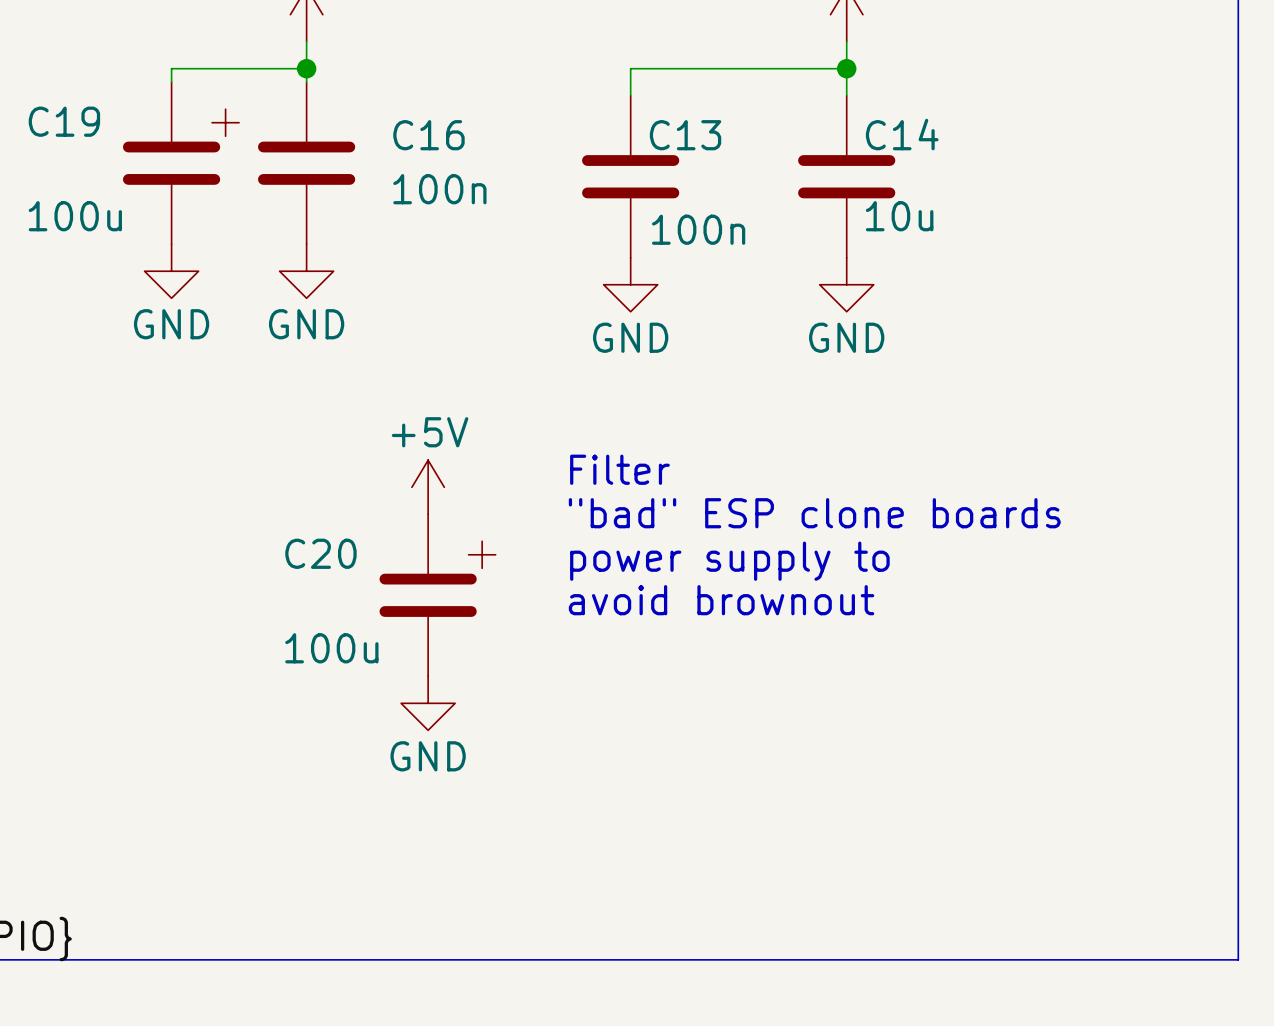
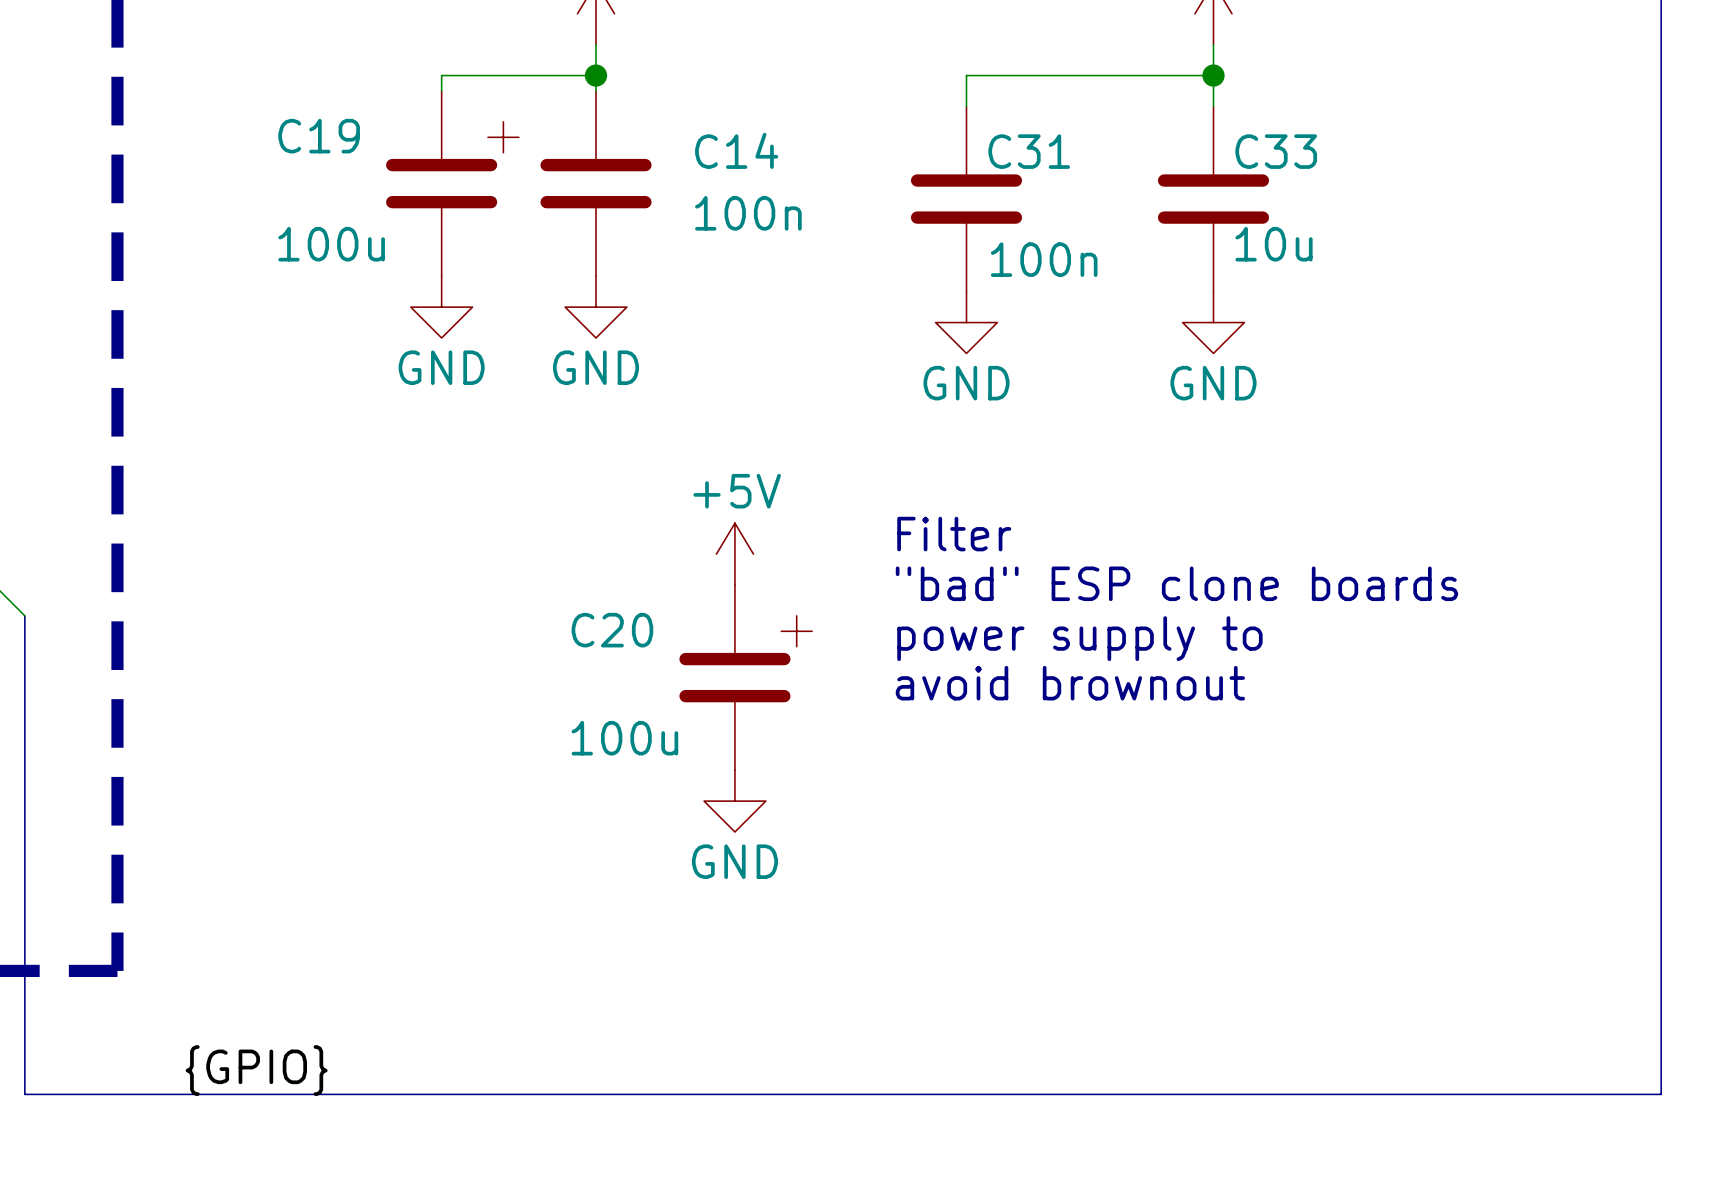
C14 name: C14 (902, 134) -> C33 (1276, 151)
C16 name: C16 (428, 135) -> C14 (736, 150)
C13 name: C13 (685, 135) -> C31 (1029, 151)

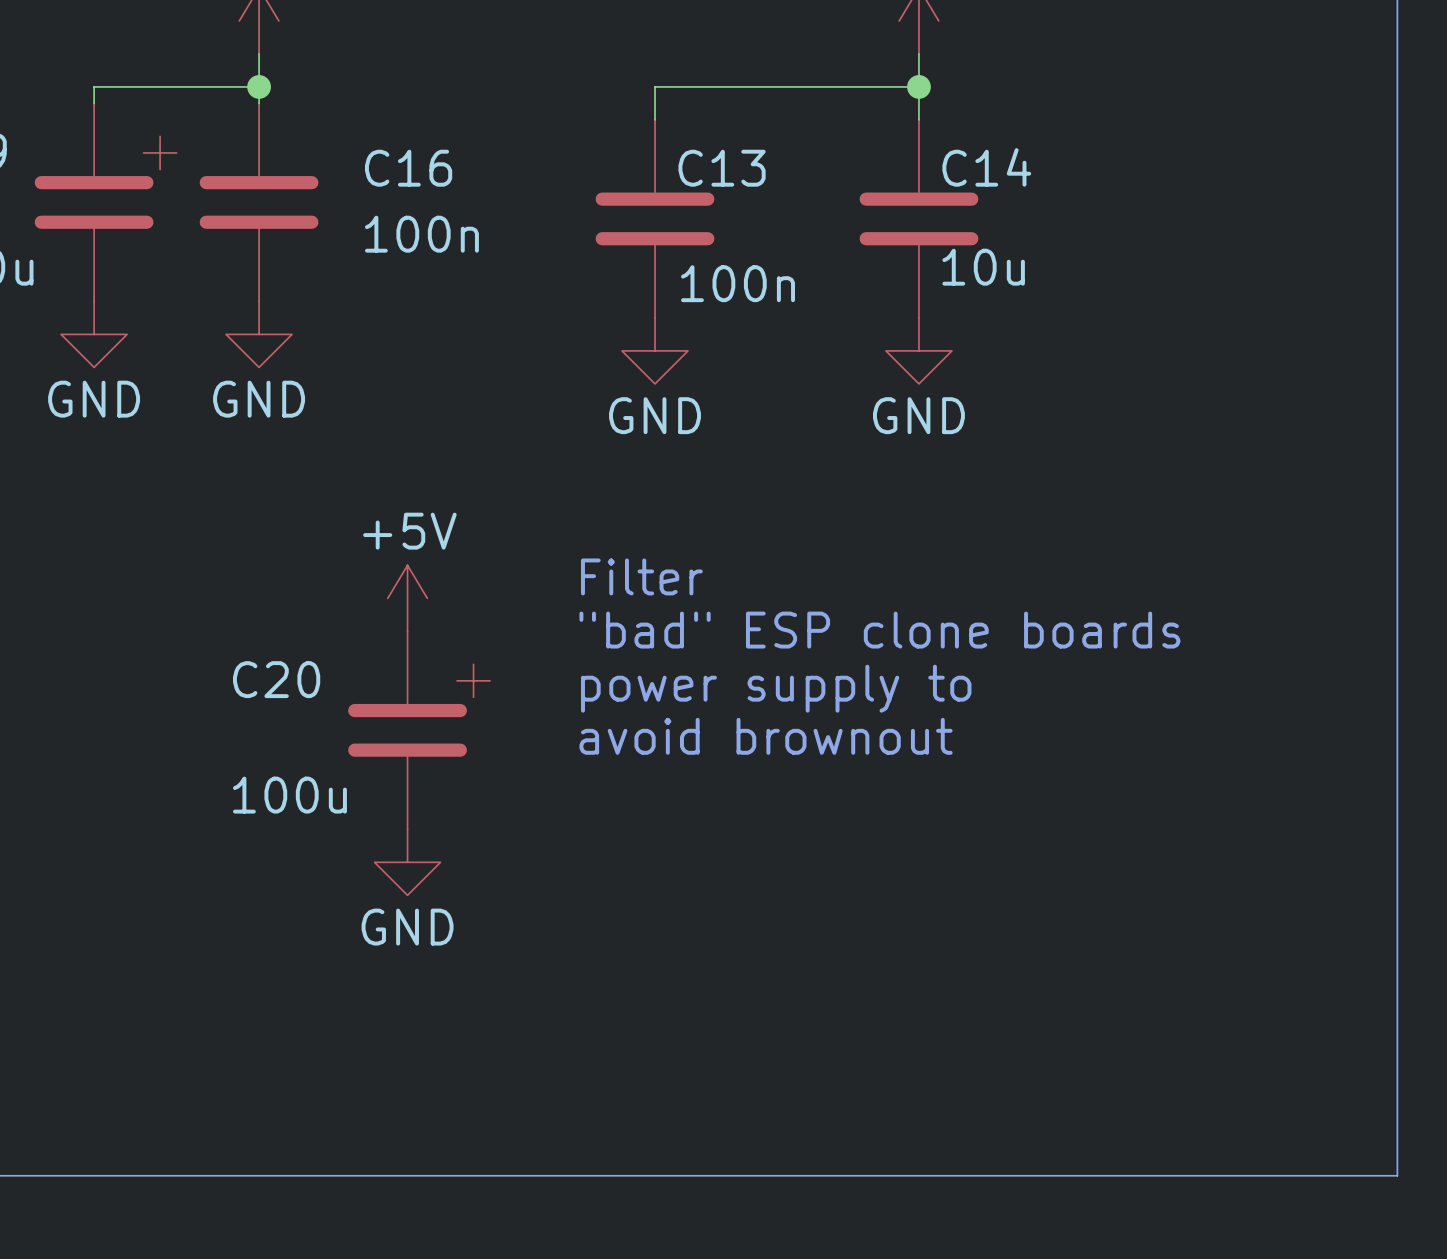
C14 name: C14 (736, 150) -> C16 (408, 168)
C31 name: C31 (1029, 151) -> C13 (722, 168)
C33 name: C33 (1276, 151) -> C14 (986, 167)

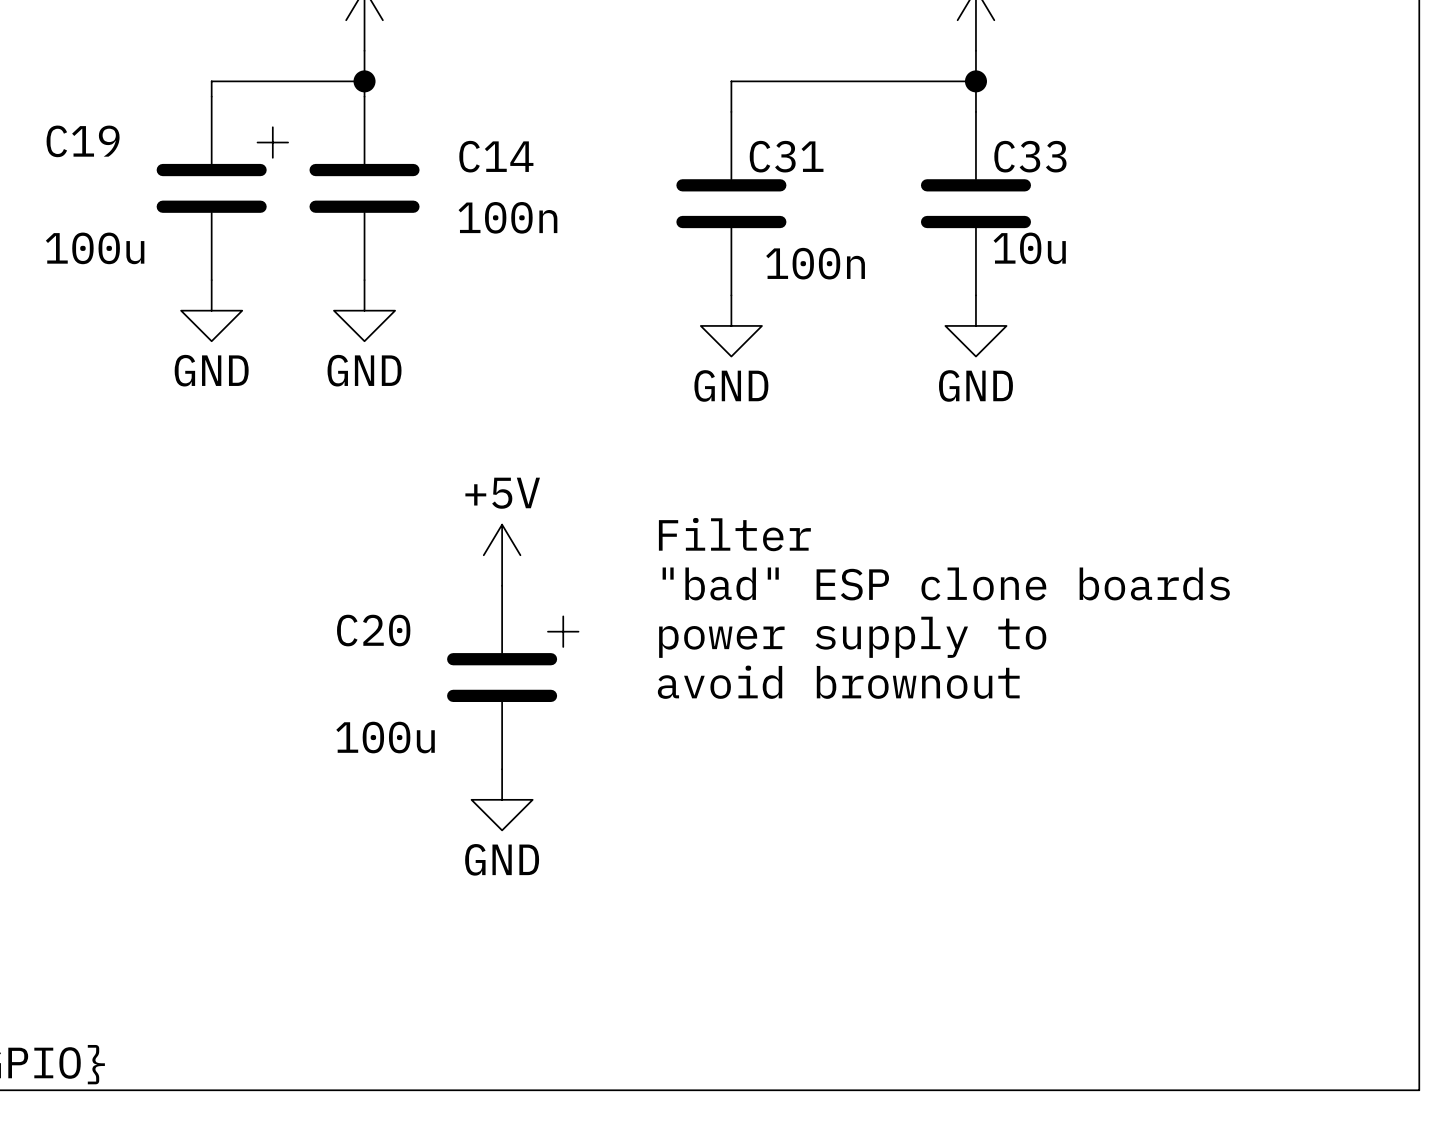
C14 name: C14 (986, 167) -> C33 (1030, 156)
C16 name: C16 (408, 168) -> C14 (496, 156)
C13 name: C13 (722, 168) -> C31 (786, 156)

